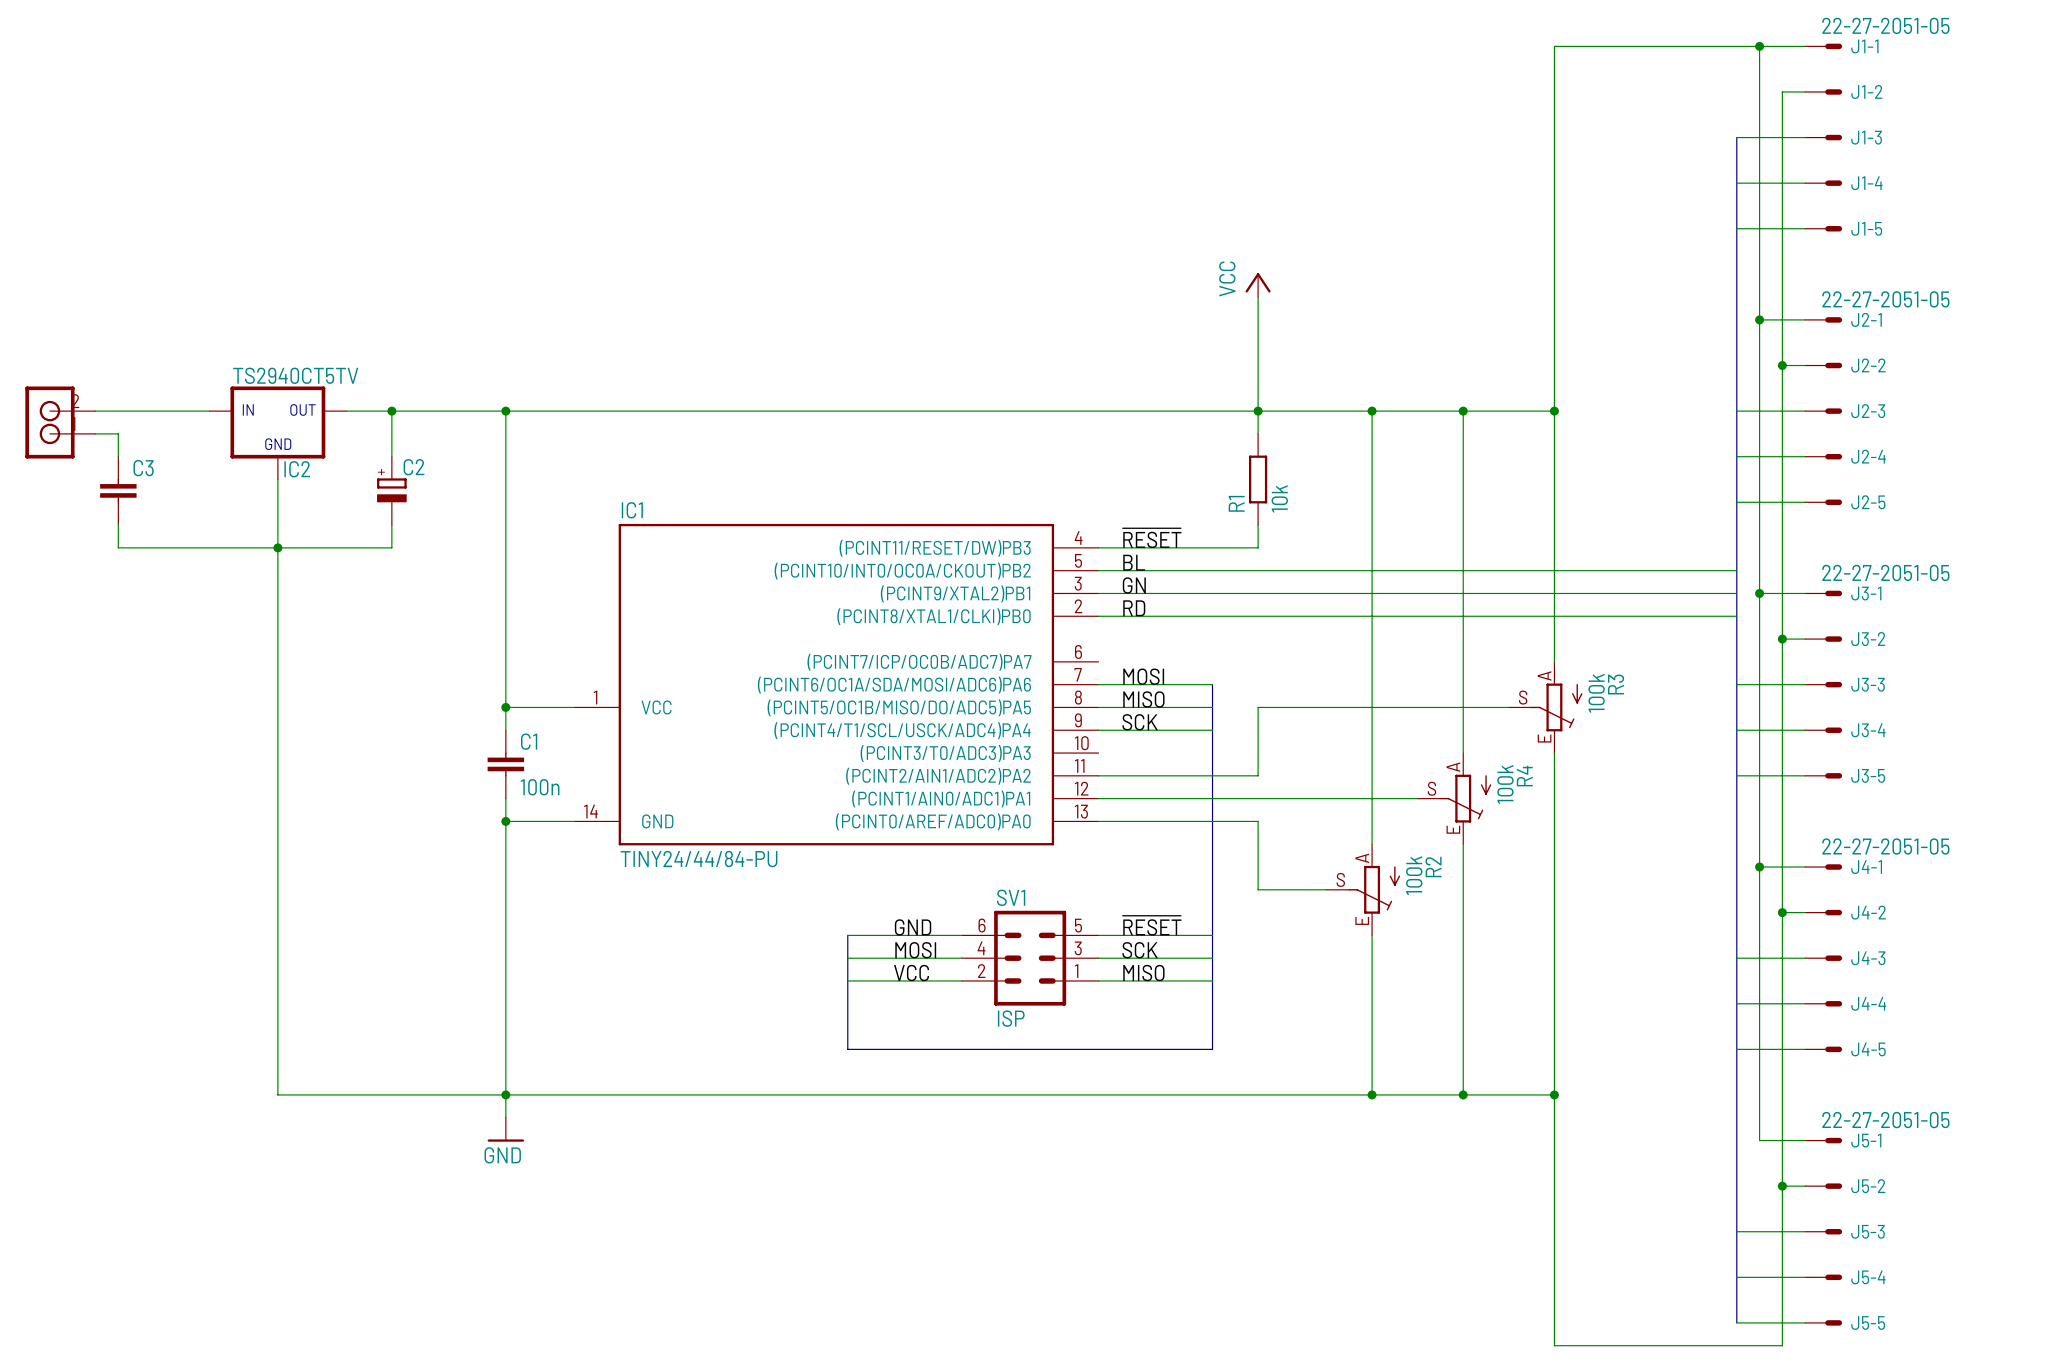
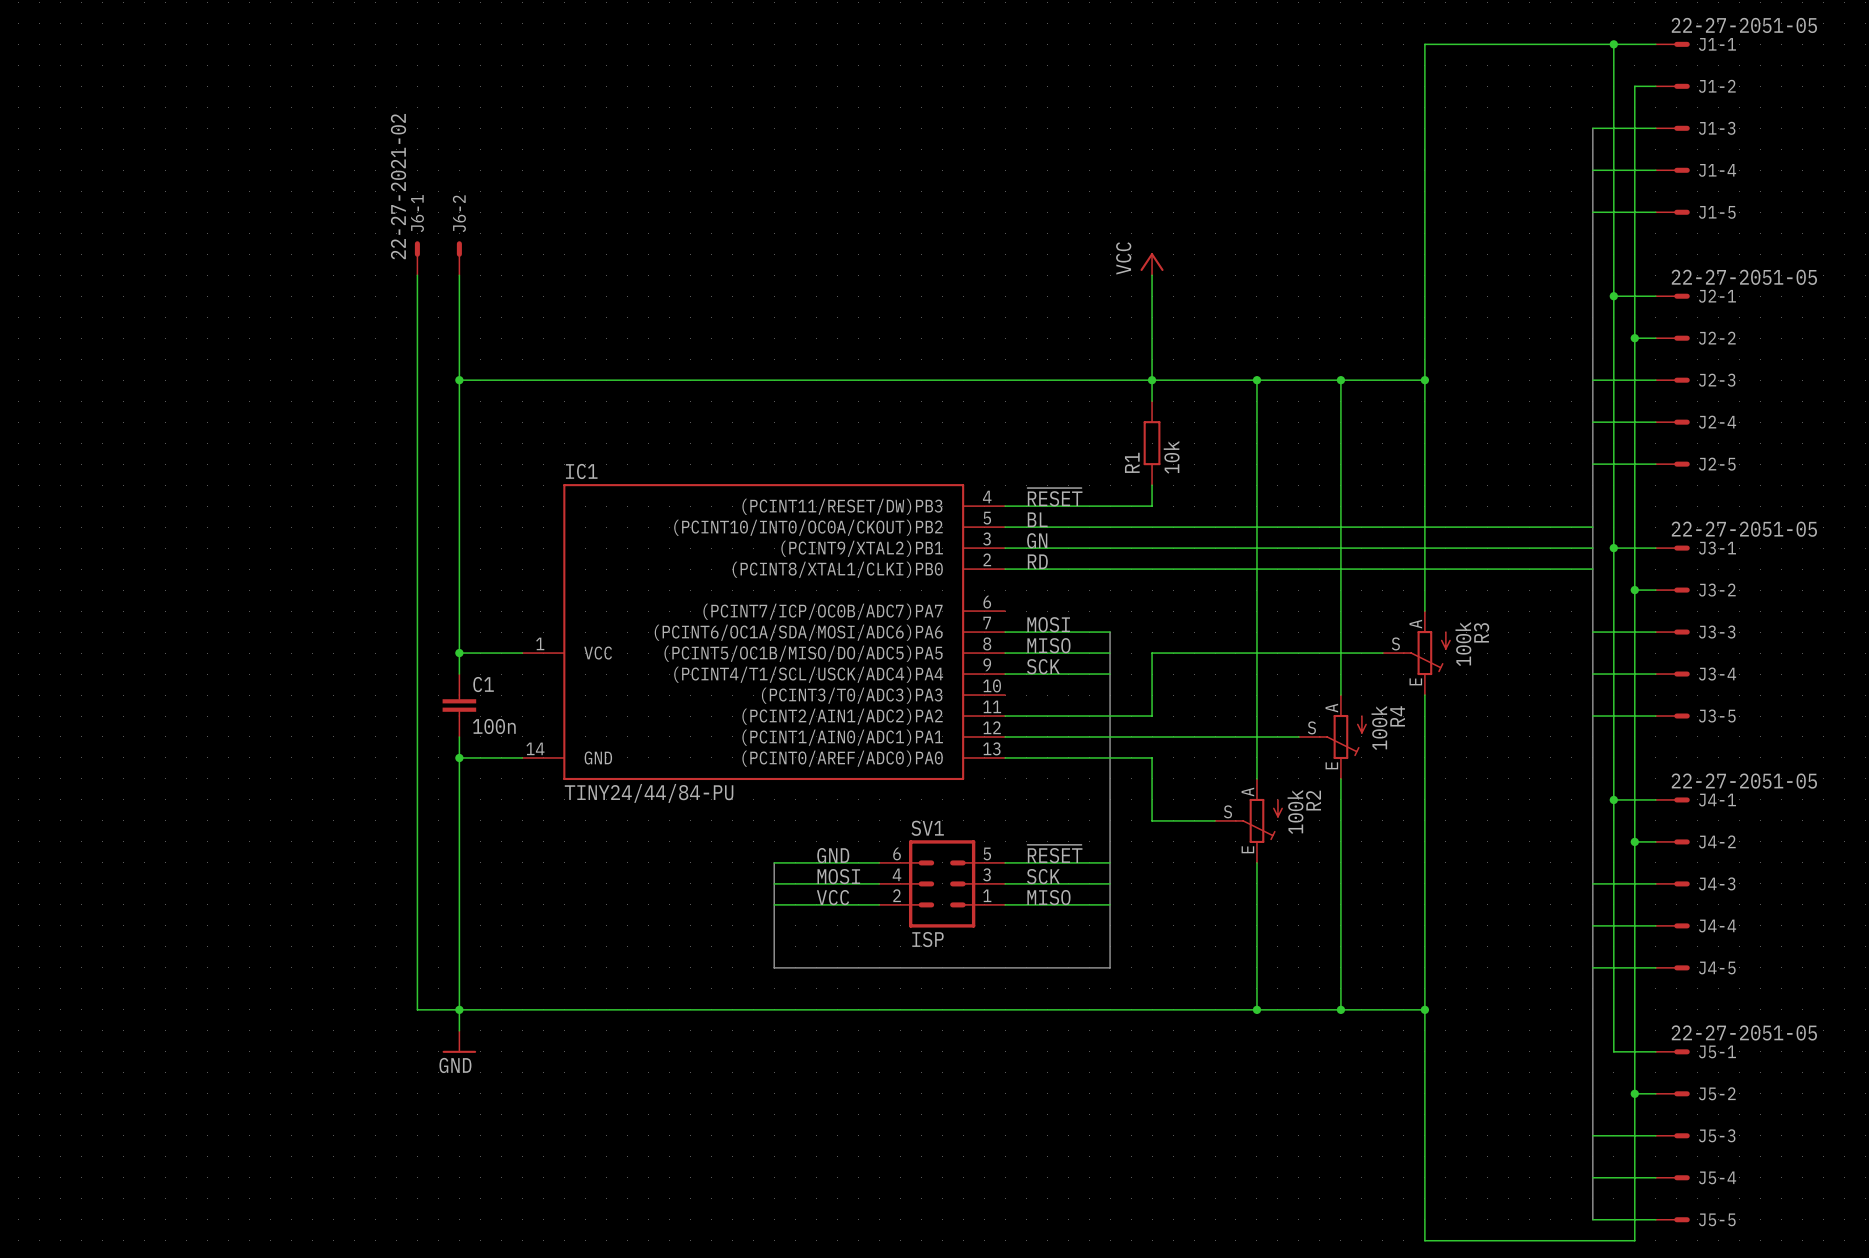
J6-1: none -> 22-27-2021-02 (417, 258)
J6-2: none -> (459, 258)
wire: (95, 411) (209, 411) -> none
wire: (346, 411) (505, 411) -> (459, 275) (459, 380)
wire: (391, 411) (391, 456) -> none
junction: (391, 411) -> none
part: (60, 422) -> none
IC2: TS2940CT5TV (277, 432) -> none
wire: (95, 433) (118, 433) (118, 456) -> none
wire: (277, 479) (277, 1094) (460, 1094) -> (417, 275) (417, 1009)
C3: (118, 490) -> none
C2: (391, 490) -> none
wire: (118, 525) (118, 547) (391, 547) (391, 525) -> none
junction: (277, 547) -> none

